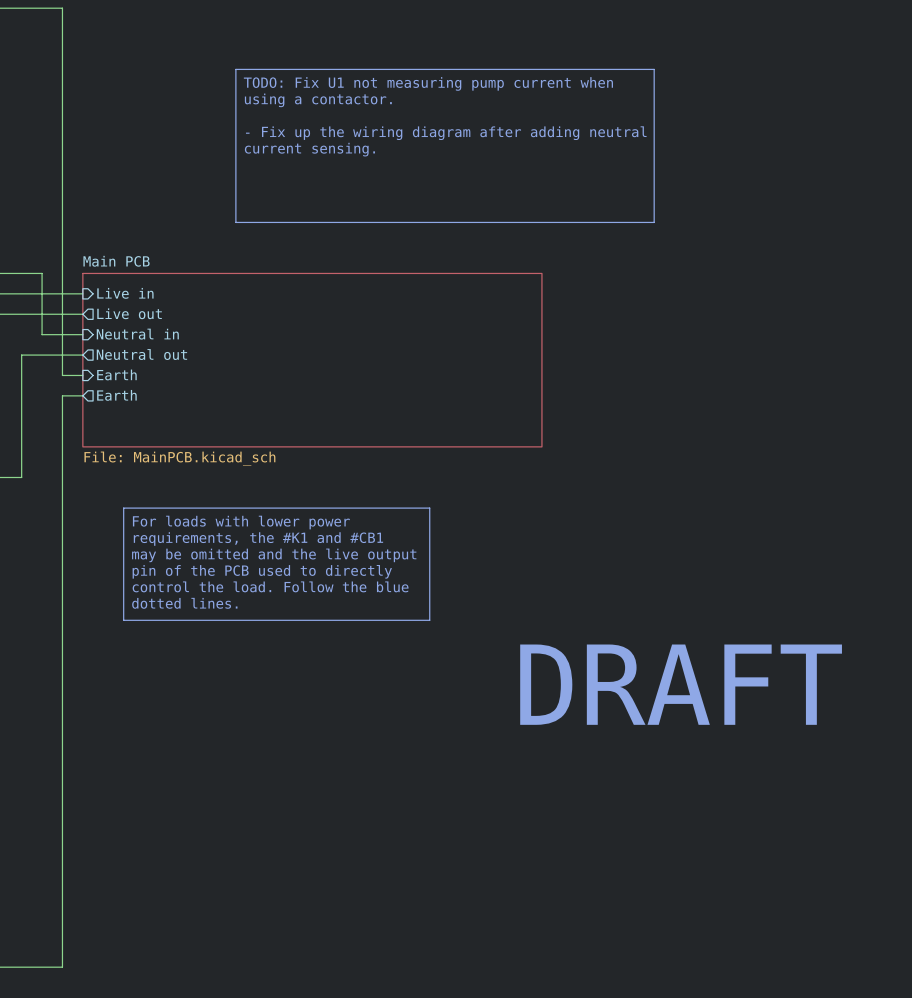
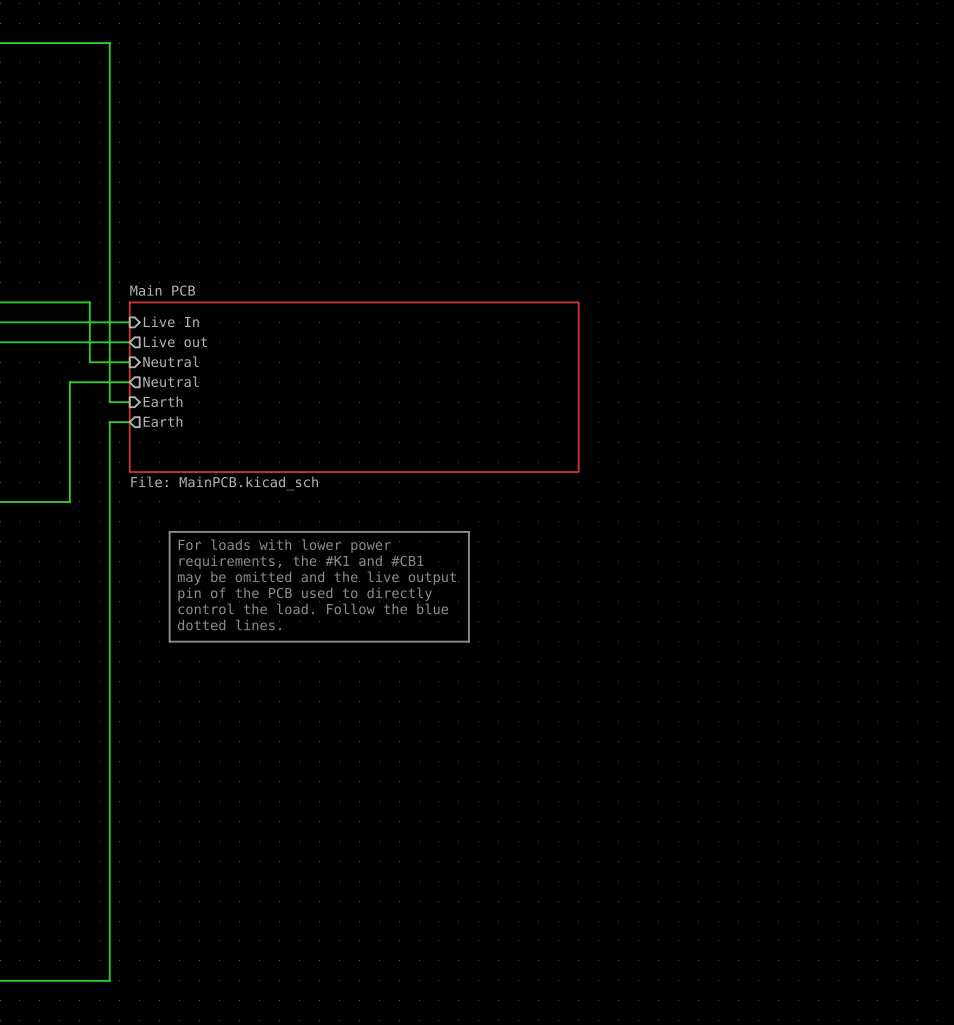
line: (235, 69) (654, 69) (654, 222) (235, 222) (235, 69) -> none
text: TODO: Fix U1 not measuring pump current when (428, 83) -> none
text: using a contactor. (318, 100) -> none
text: - Fix up the wiring diagram after adding neutral (446, 133) -> none
text: current sensing. (309, 149) -> none
sheet pin: Live in (125, 293) -> Live In (171, 321)
sheet pin: Neutral in (137, 334) -> Neutral (171, 361)
sheet pin: Neutral out (141, 354) -> Neutral (171, 381)
text: DRAFT (681, 684) -> none

